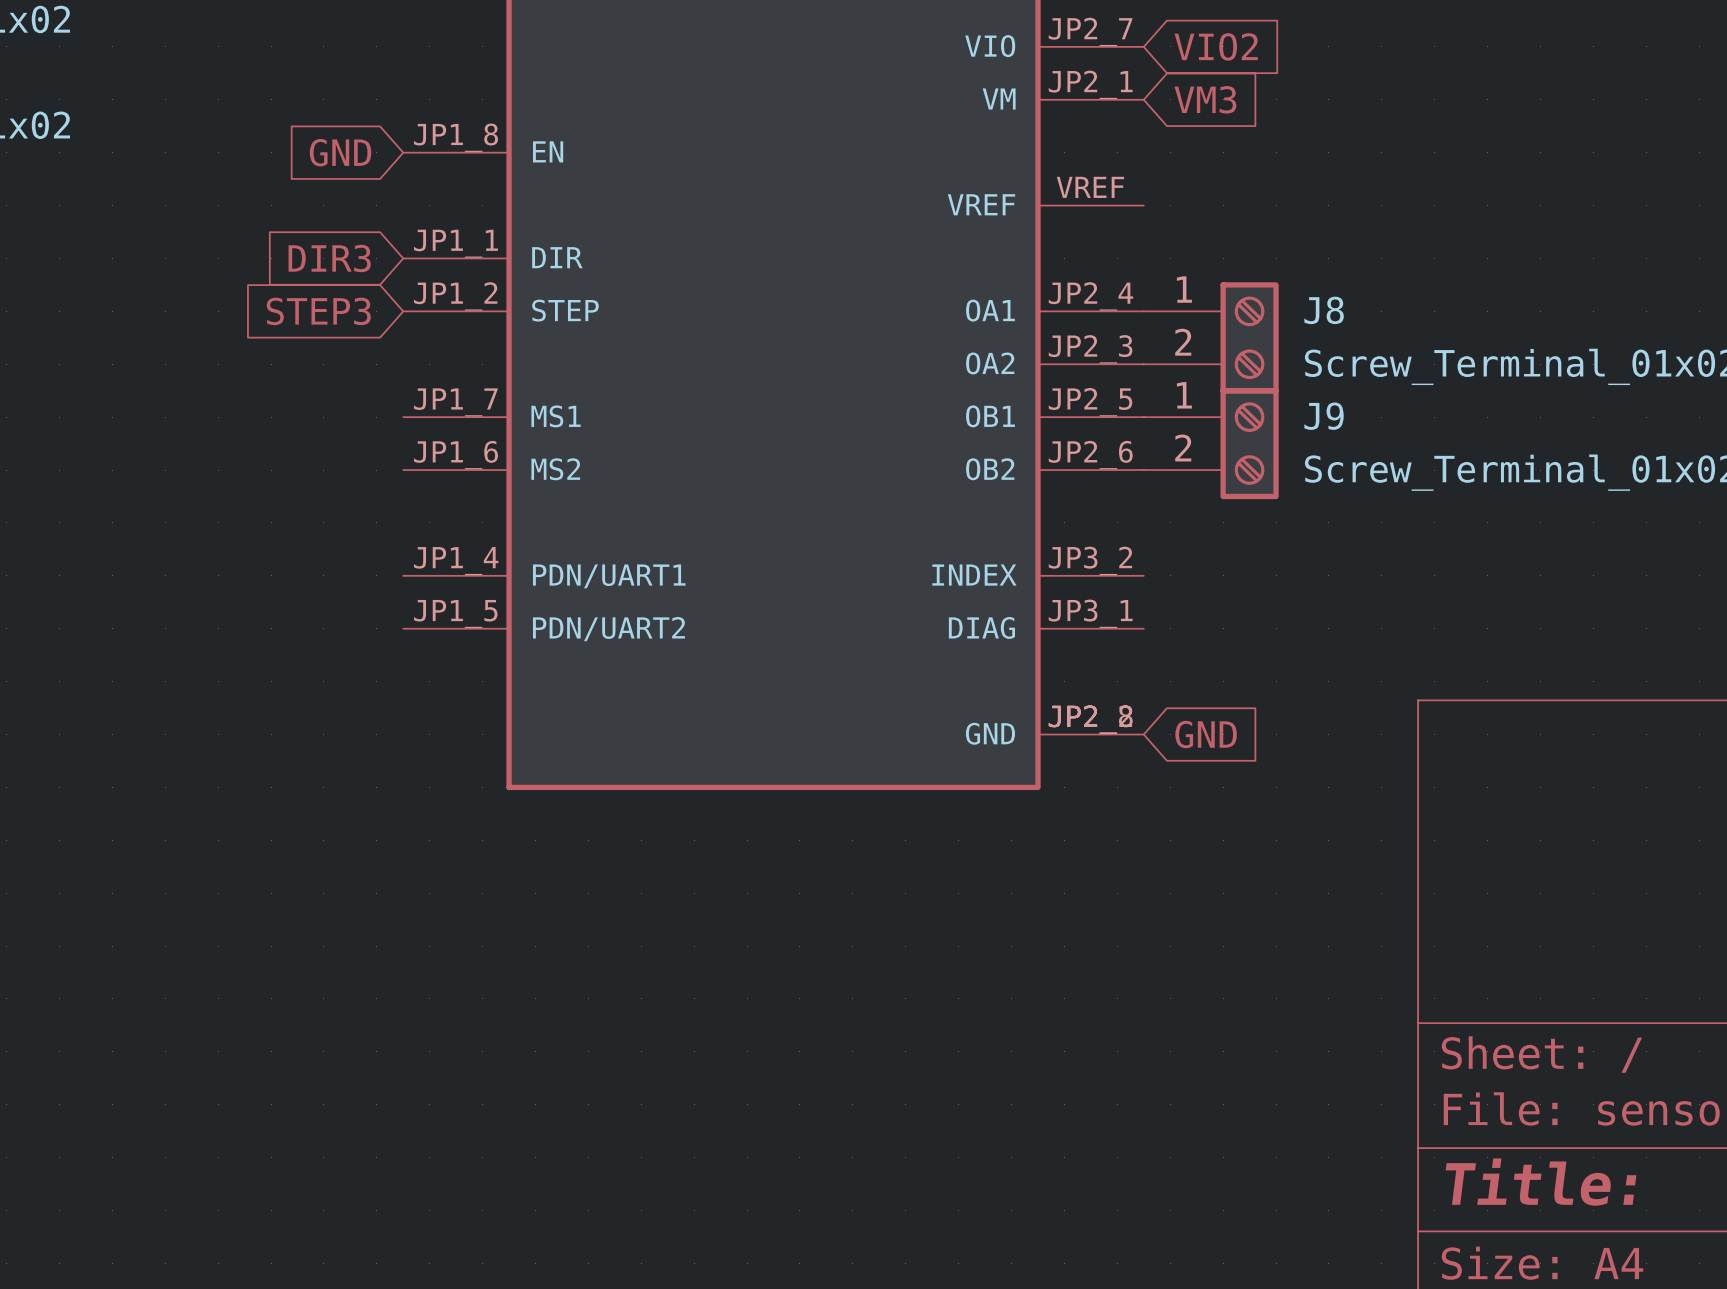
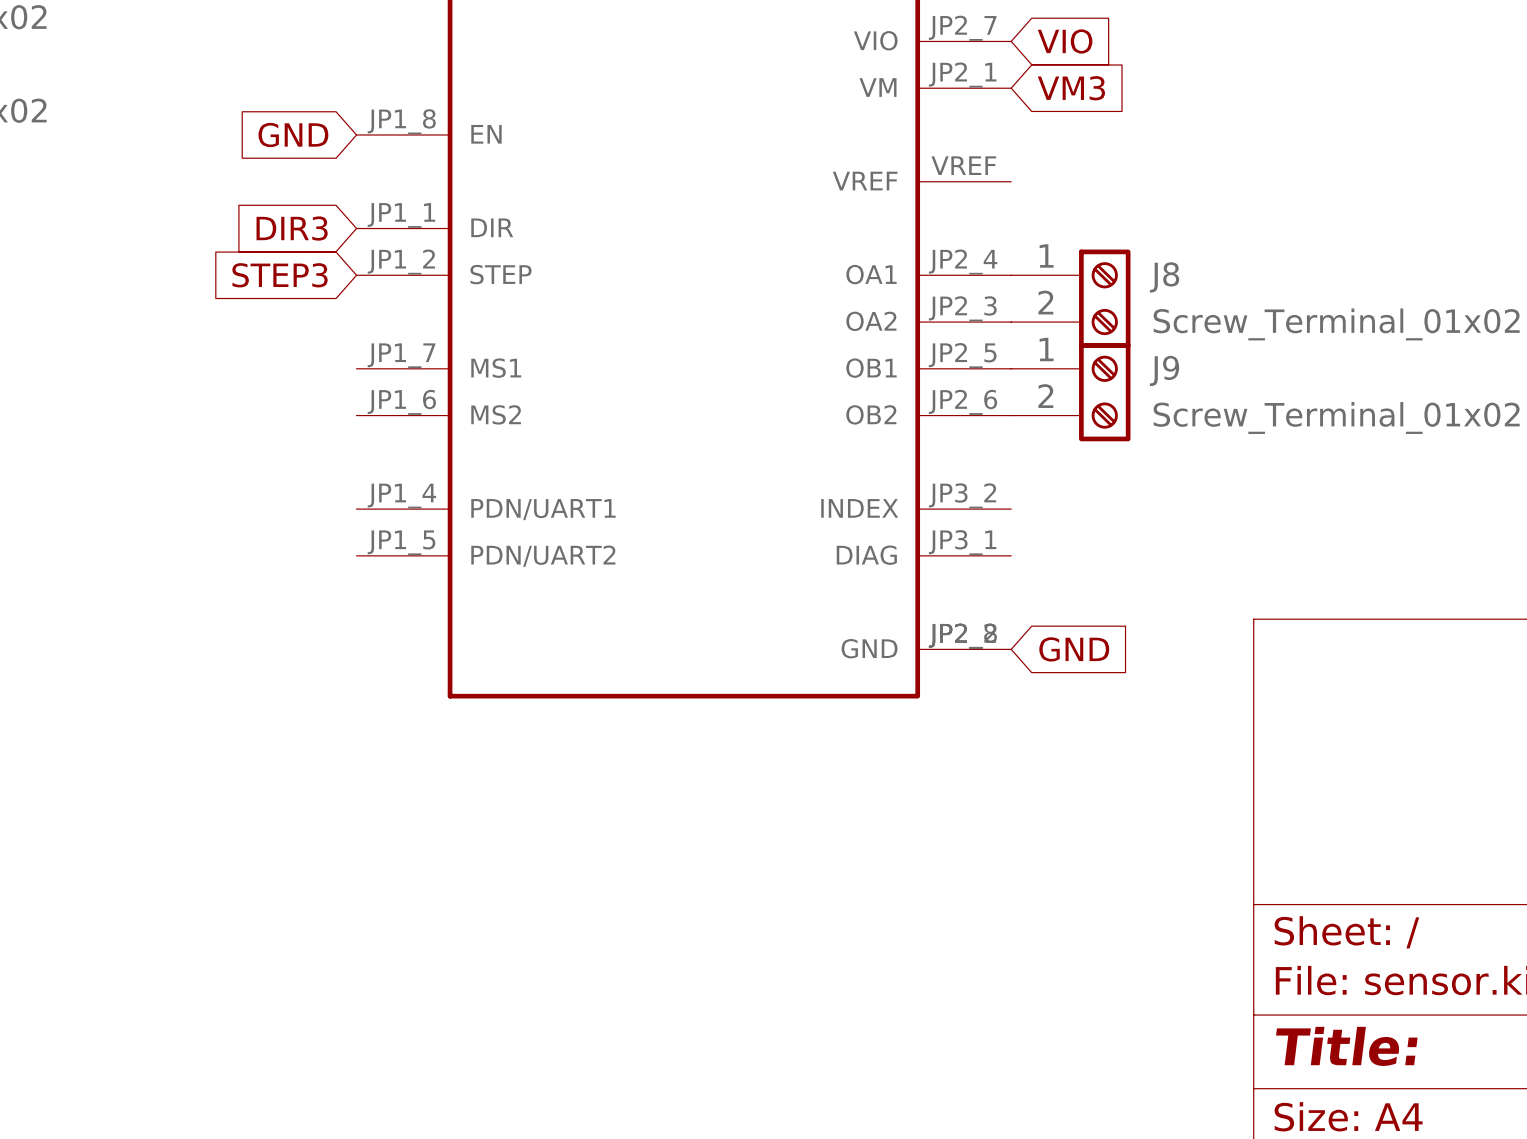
global label: VIO2 (1216, 46) -> VIO (1065, 41)

